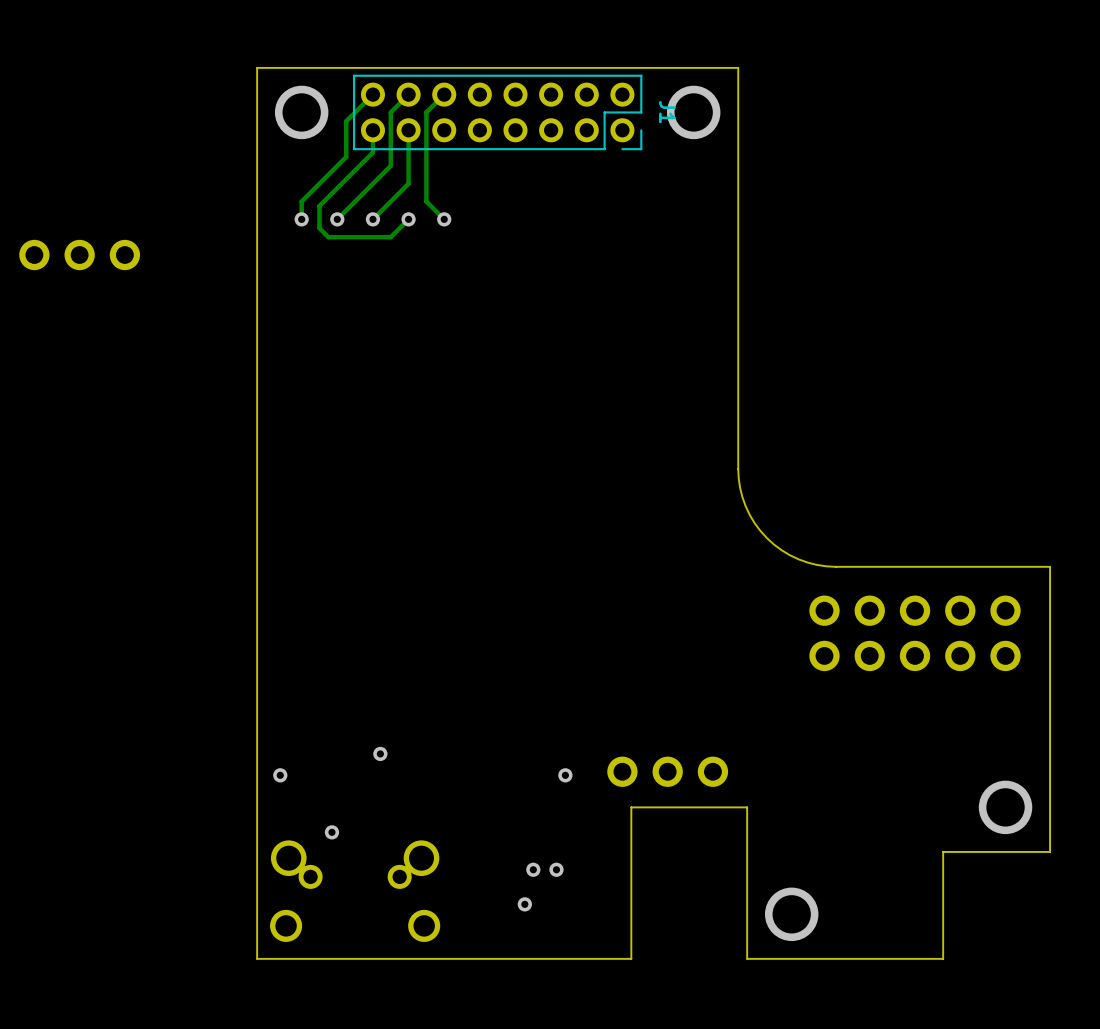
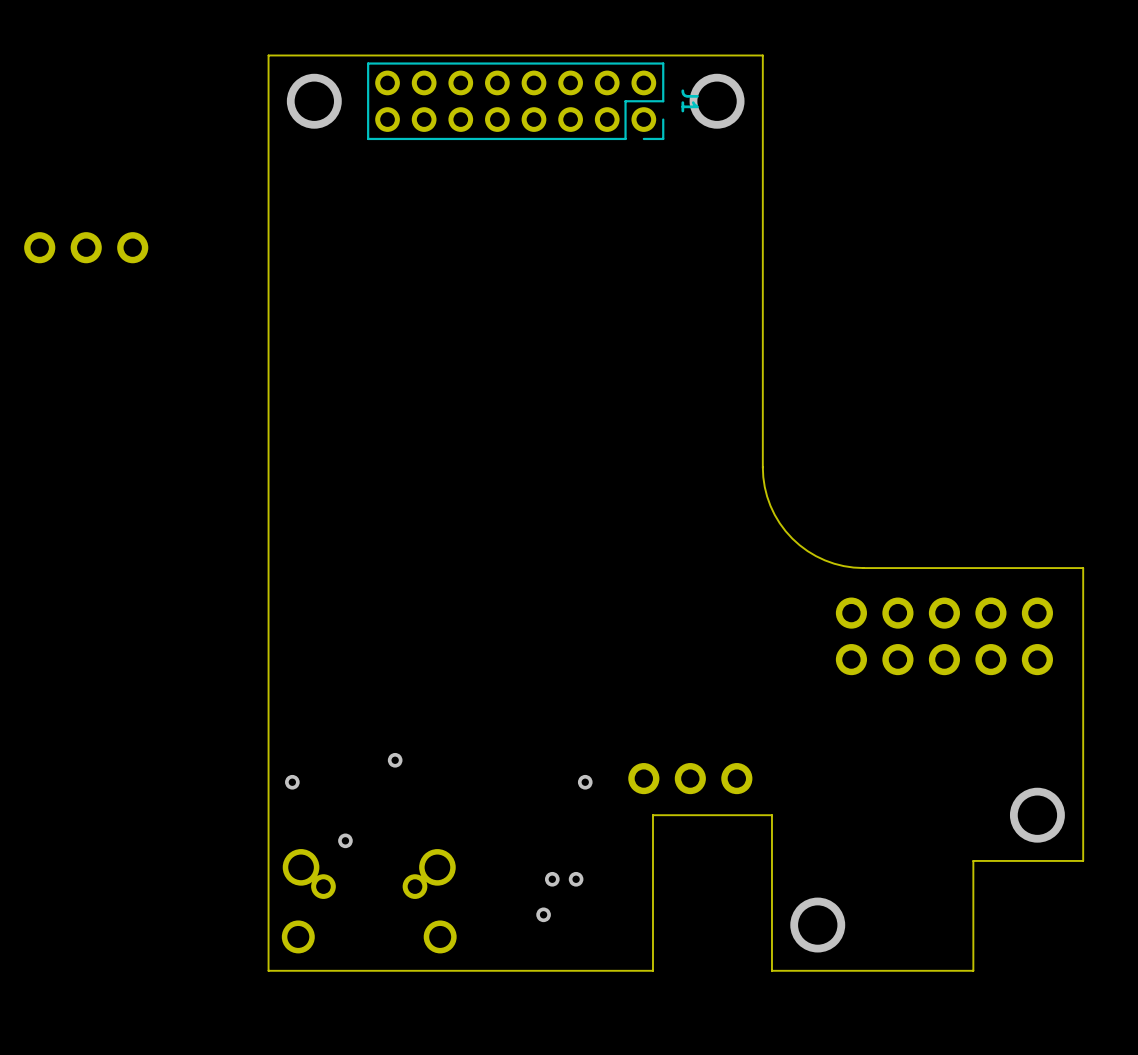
track: (372, 94) (346, 121) (346, 156) (301, 201) (301, 219) -> none
track: (408, 94) (390, 112) (390, 165) (337, 219) -> none
track: (444, 94) (426, 112) (426, 201) (444, 219) -> none
track: (372, 130) (372, 152) (319, 206) (319, 228) (328, 237) (390, 237) (408, 219) -> none
track: (408, 130) (408, 183) (372, 219) -> none
via: (301, 219) -> none
via: (337, 219) -> none
via: (372, 219) -> none
via: (408, 219) -> none
via: (444, 219) -> none

